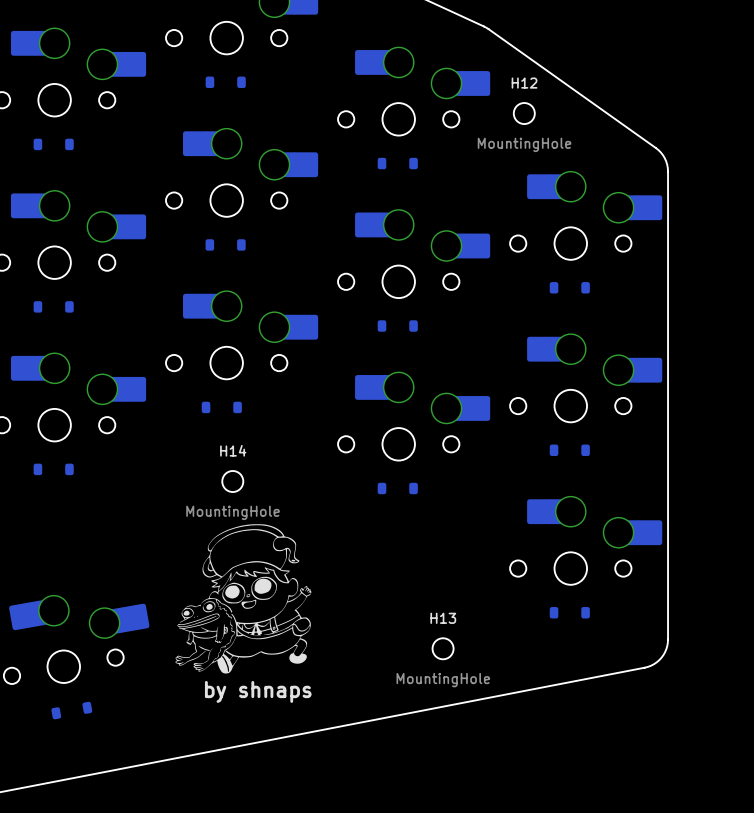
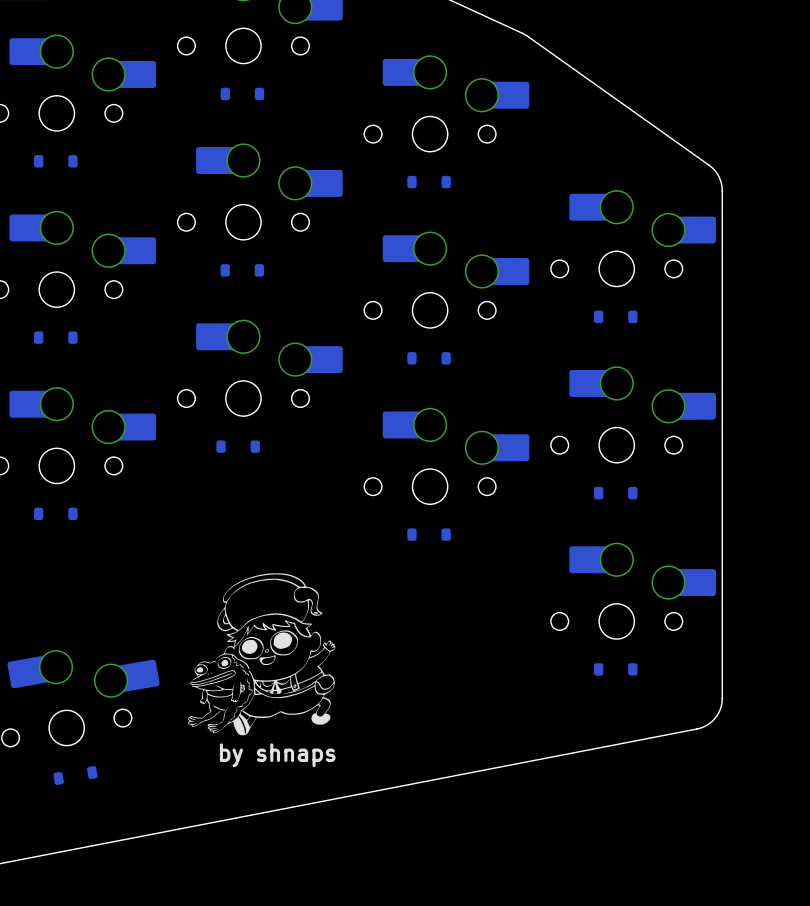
H12: MountingHole (524, 113) -> none
H14: MountingHole (232, 481) -> none
H13: MountingHole (443, 648) -> none

